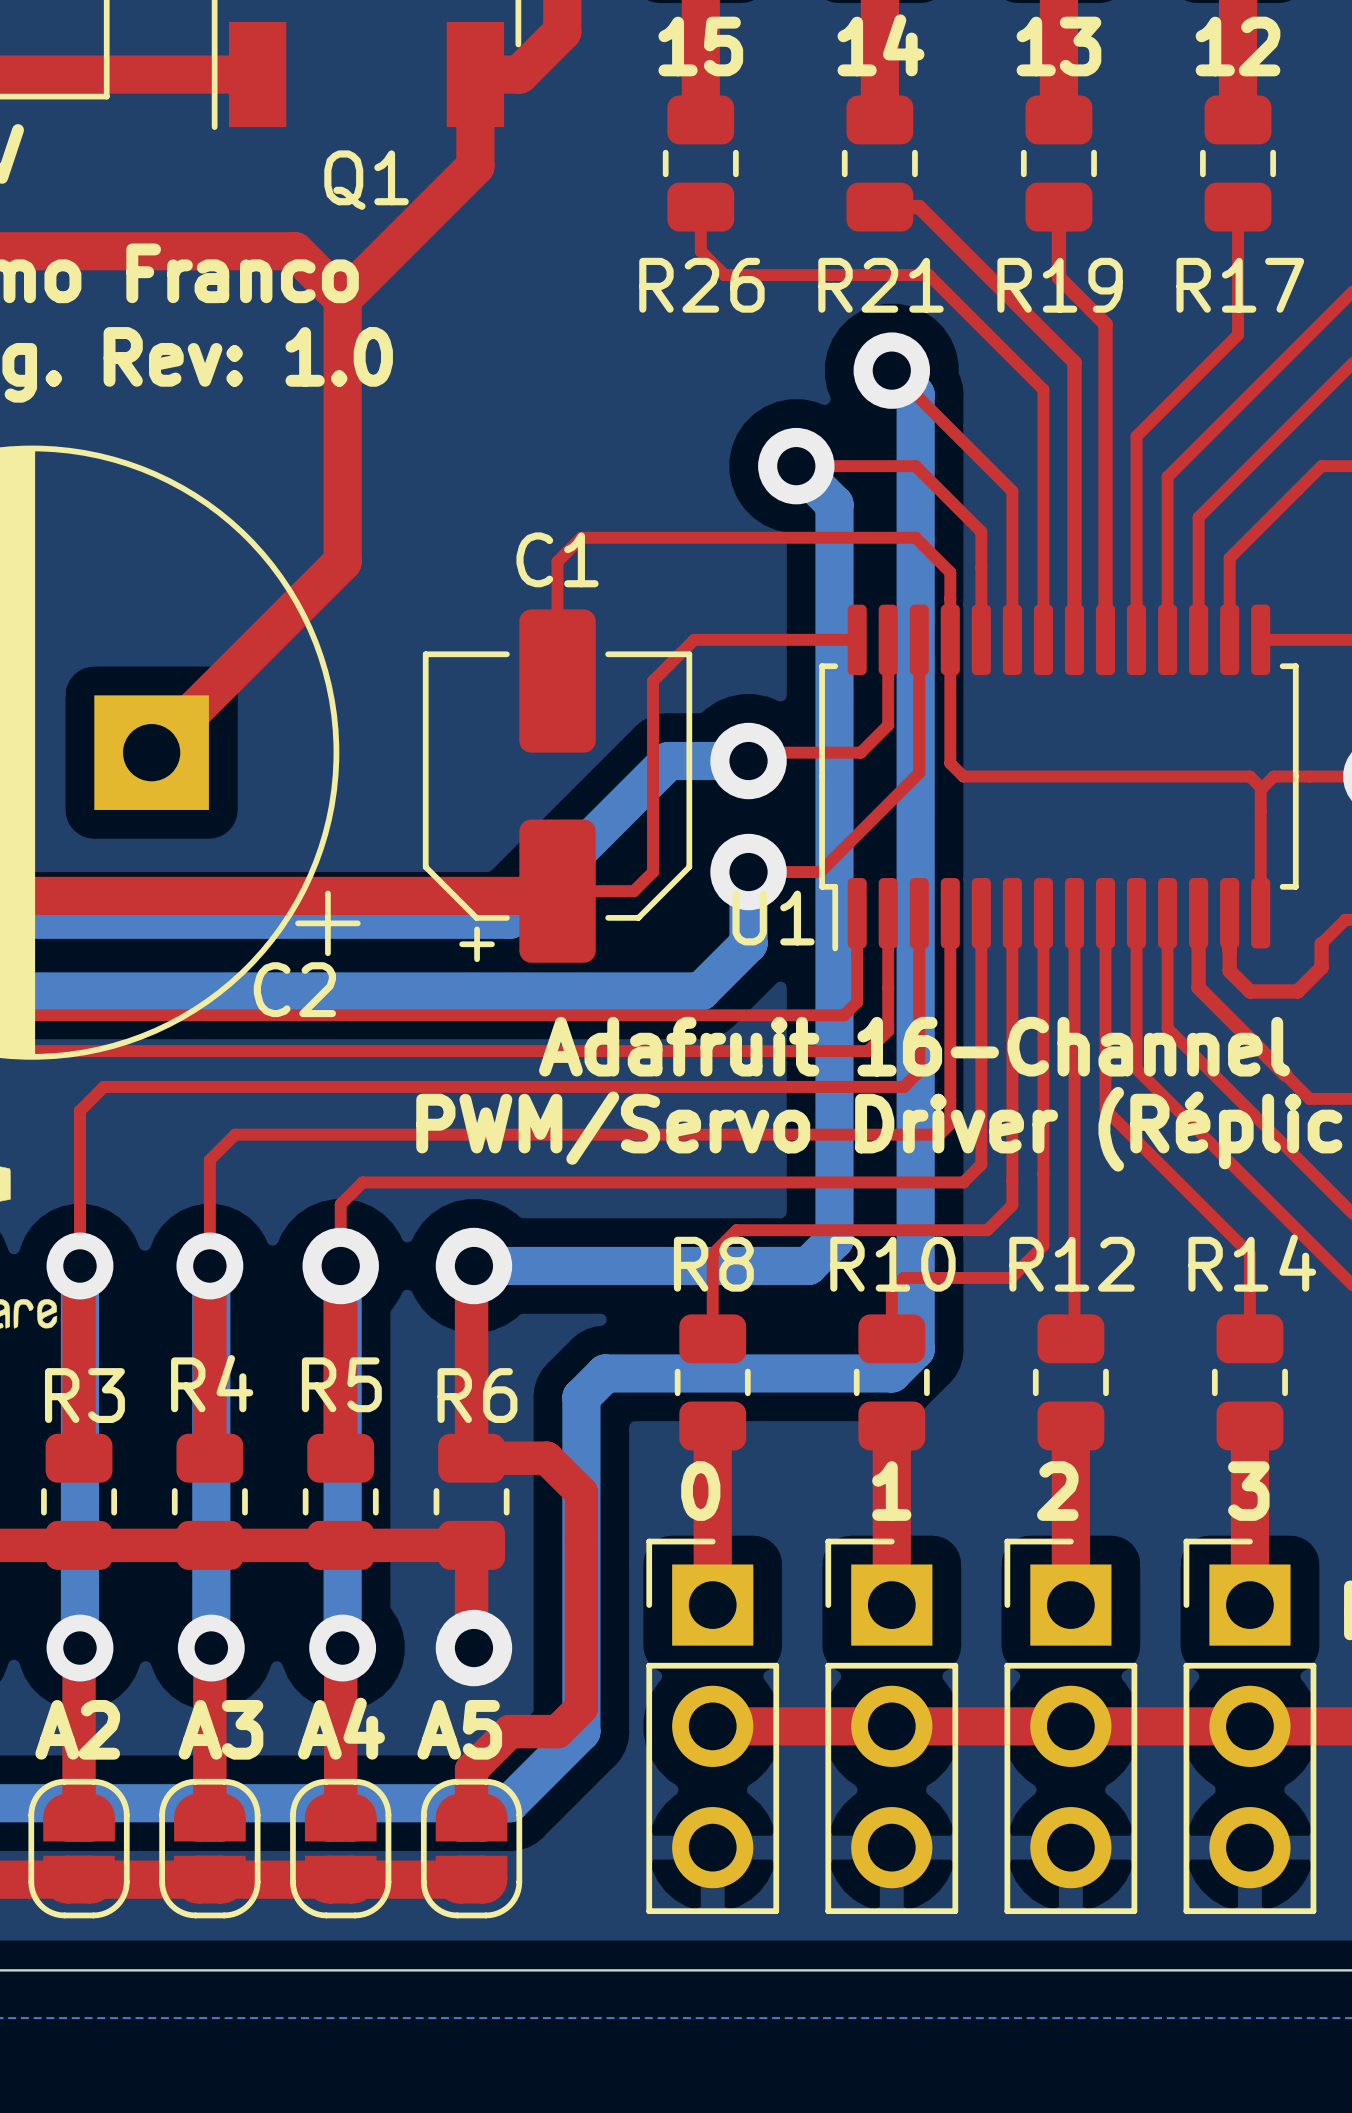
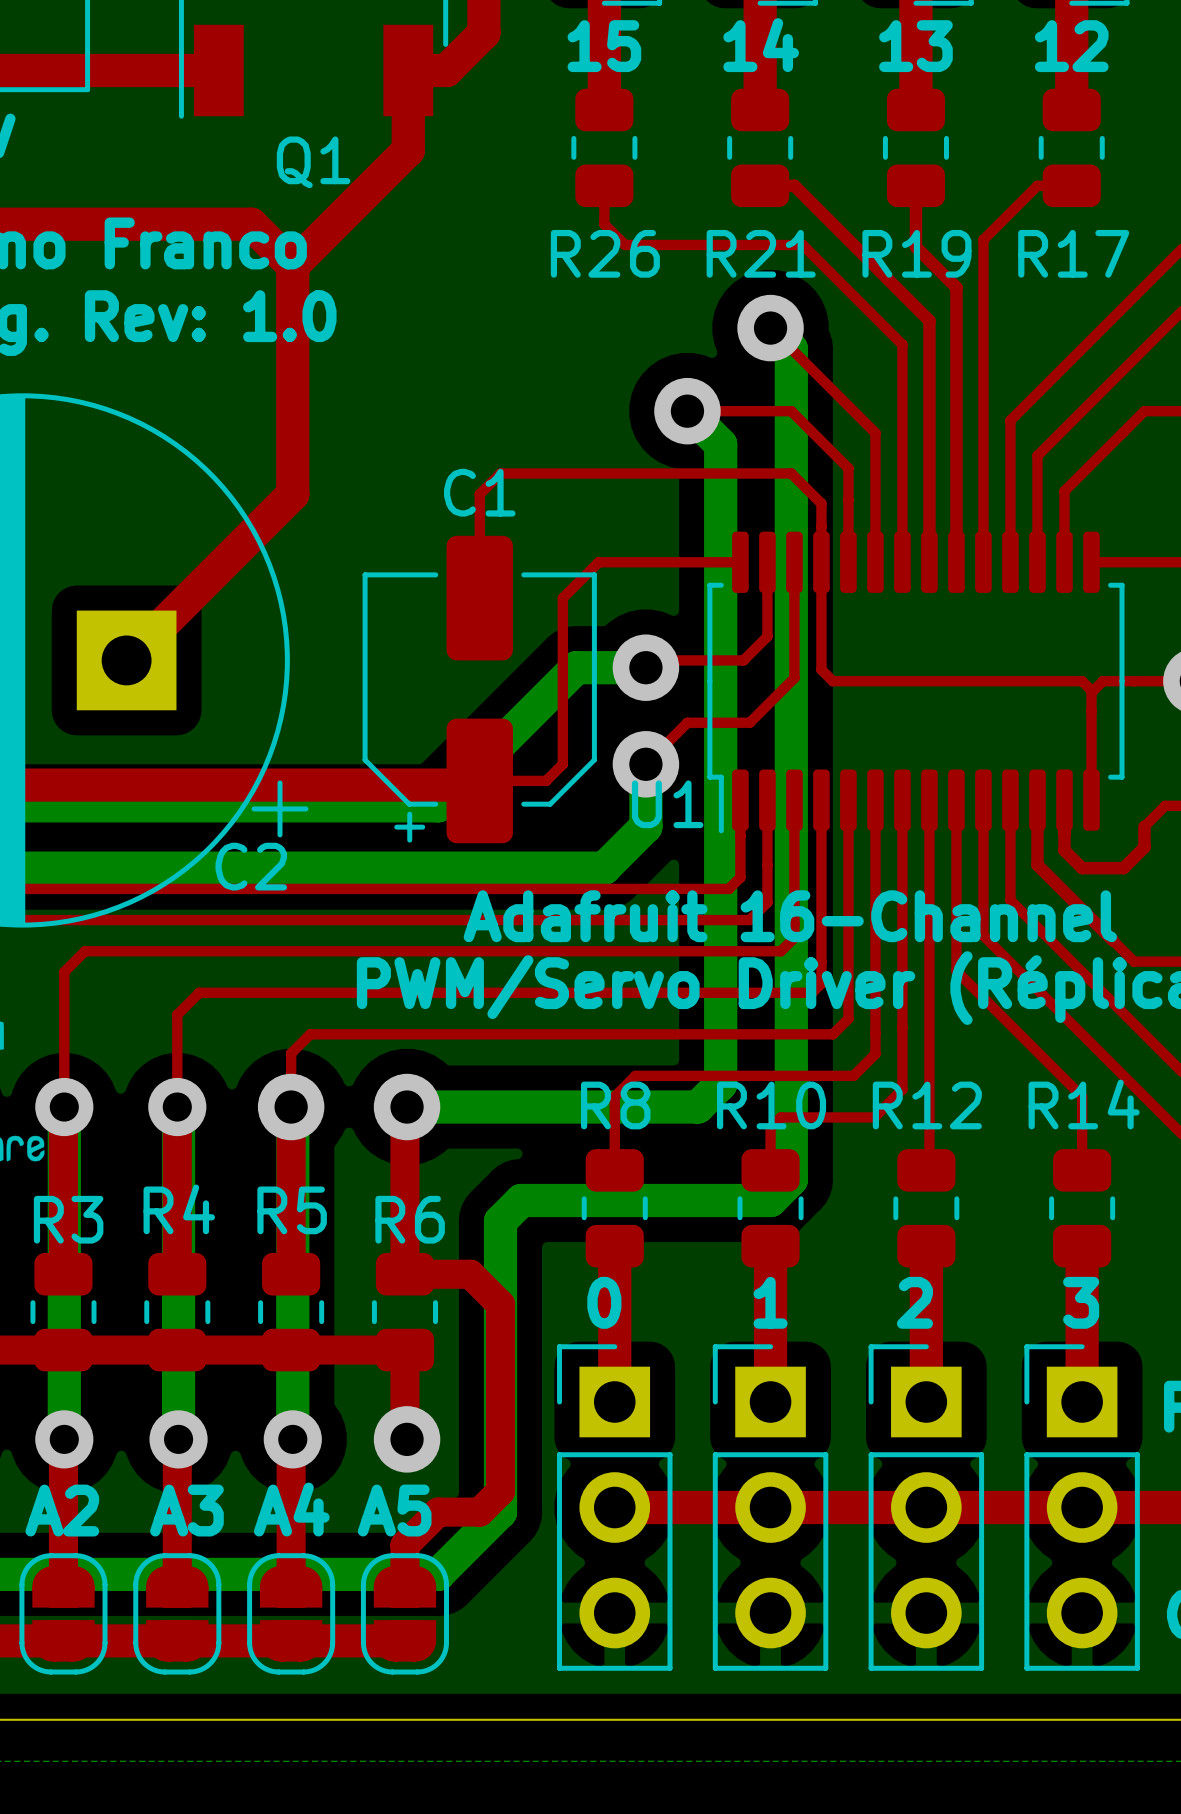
top track: (1238, 207) (1238, 334) (1136, 436) -> (1071, 185) (1037, 185) (983, 239) (983, 385)
top track: (867, 824) (820, 872) (748, 872) -> (749, 722) (687, 722) (645, 764)

